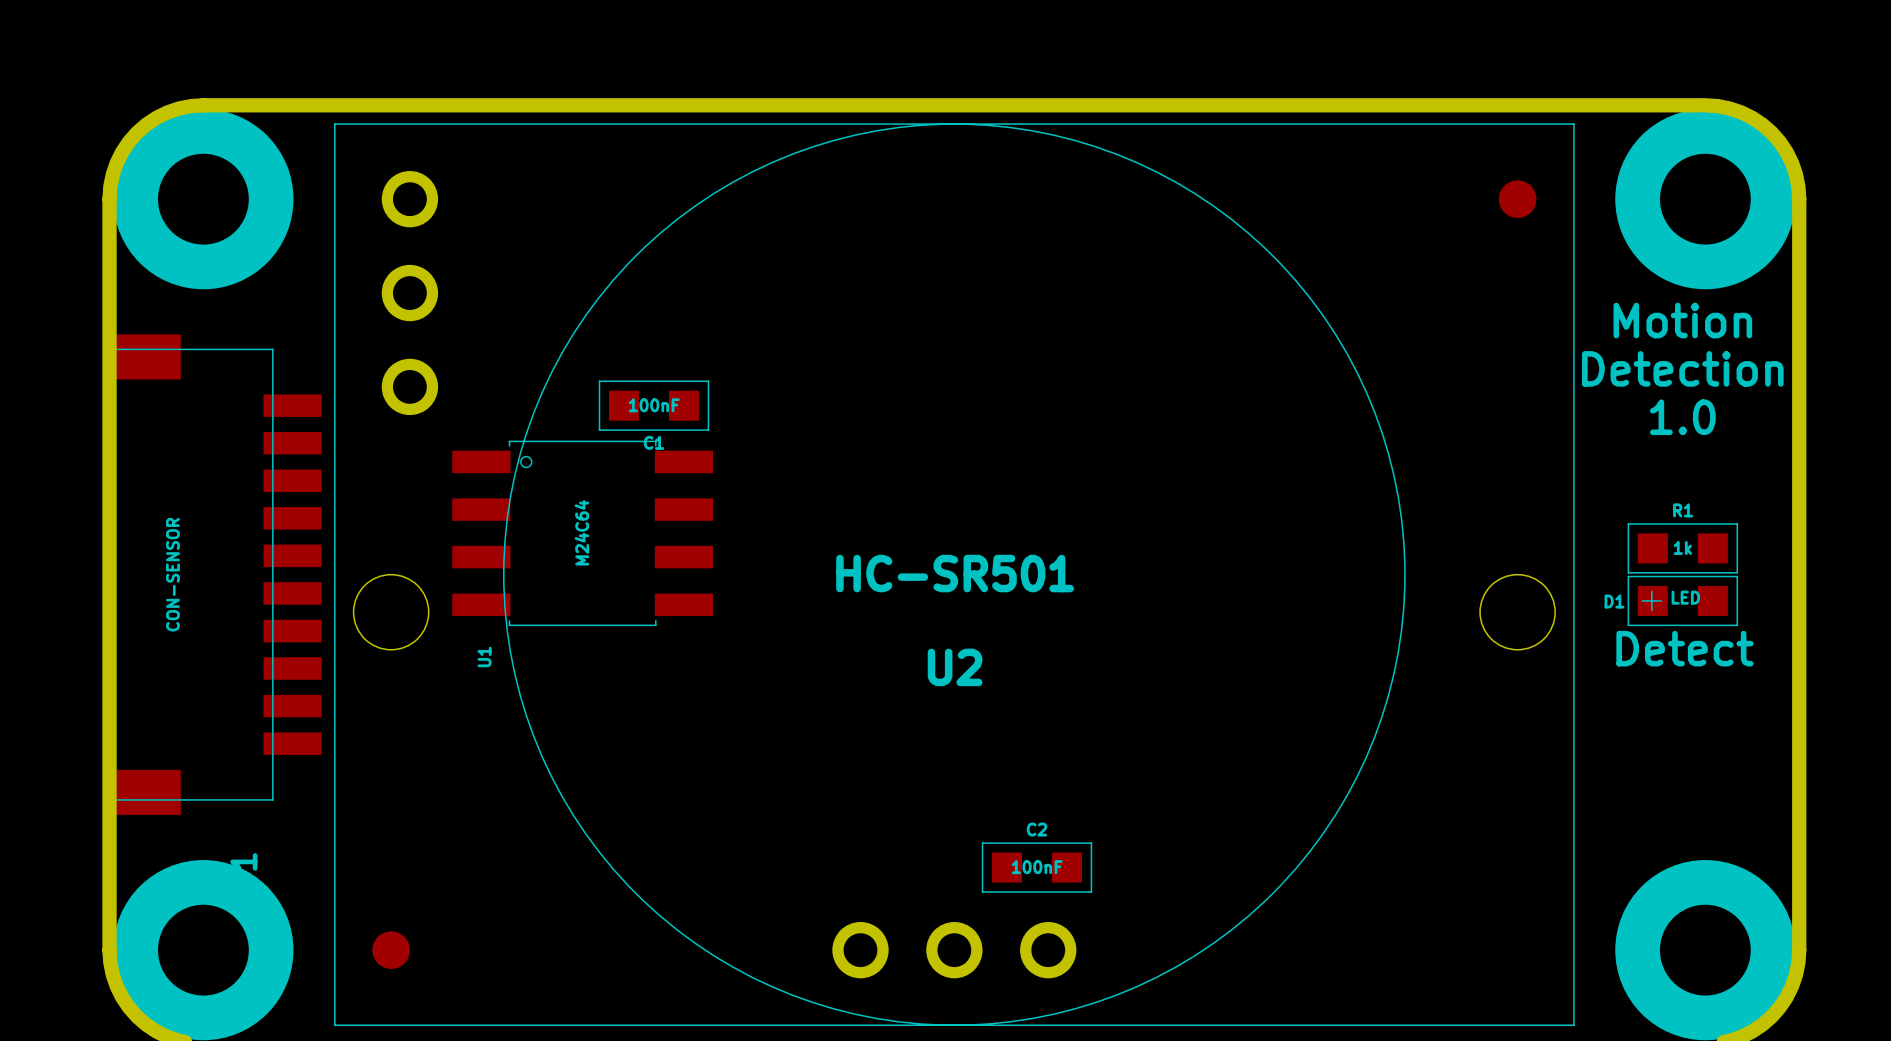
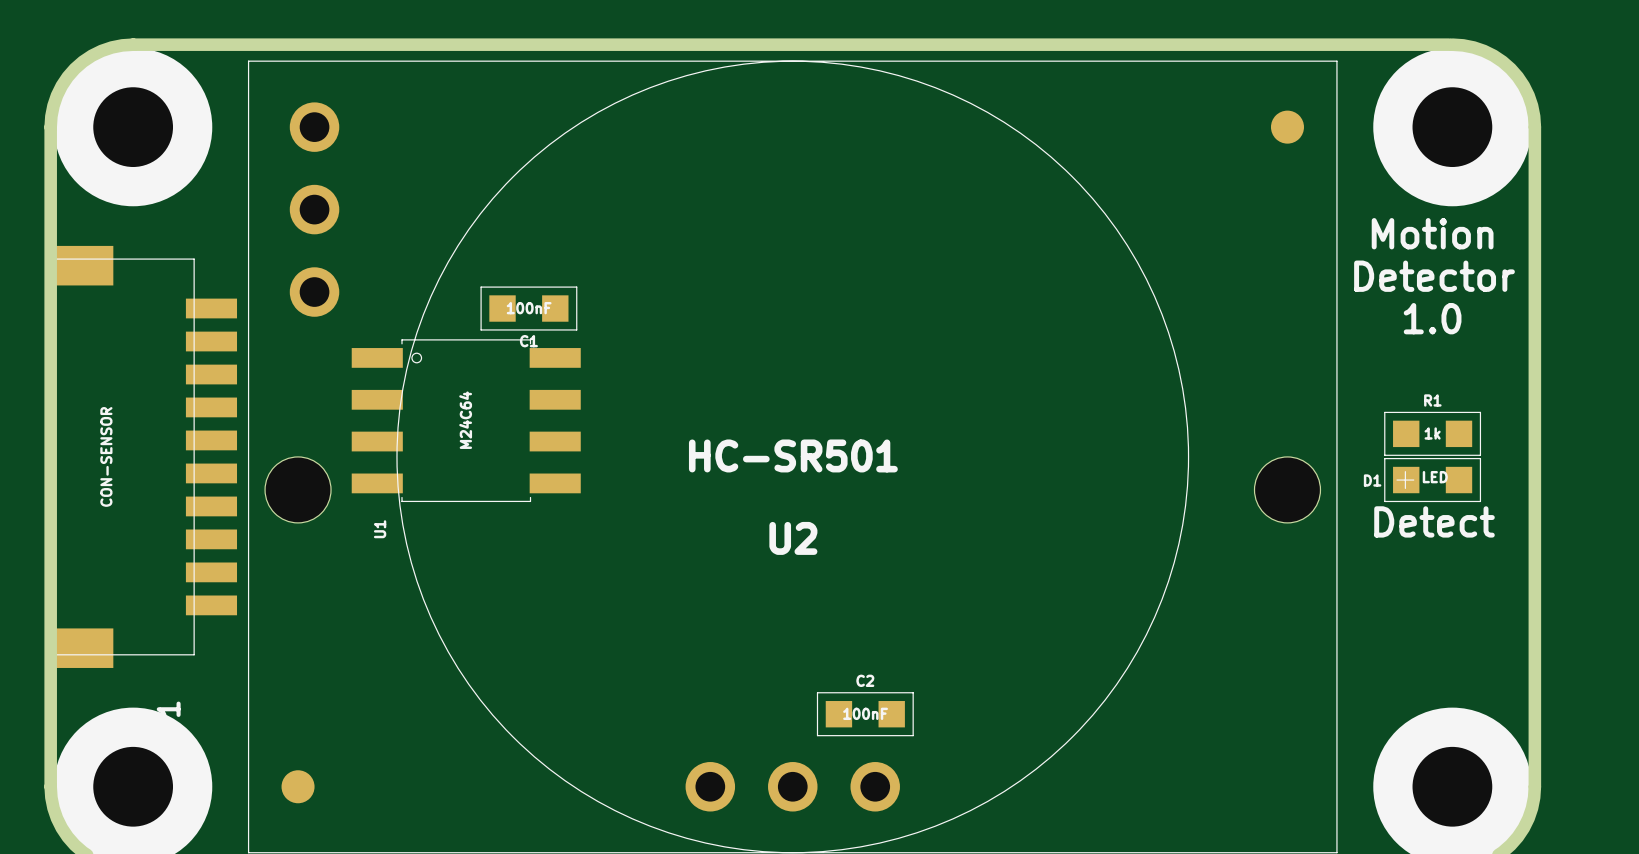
text: Detection (1682, 368) -> Detector (1434, 276)

